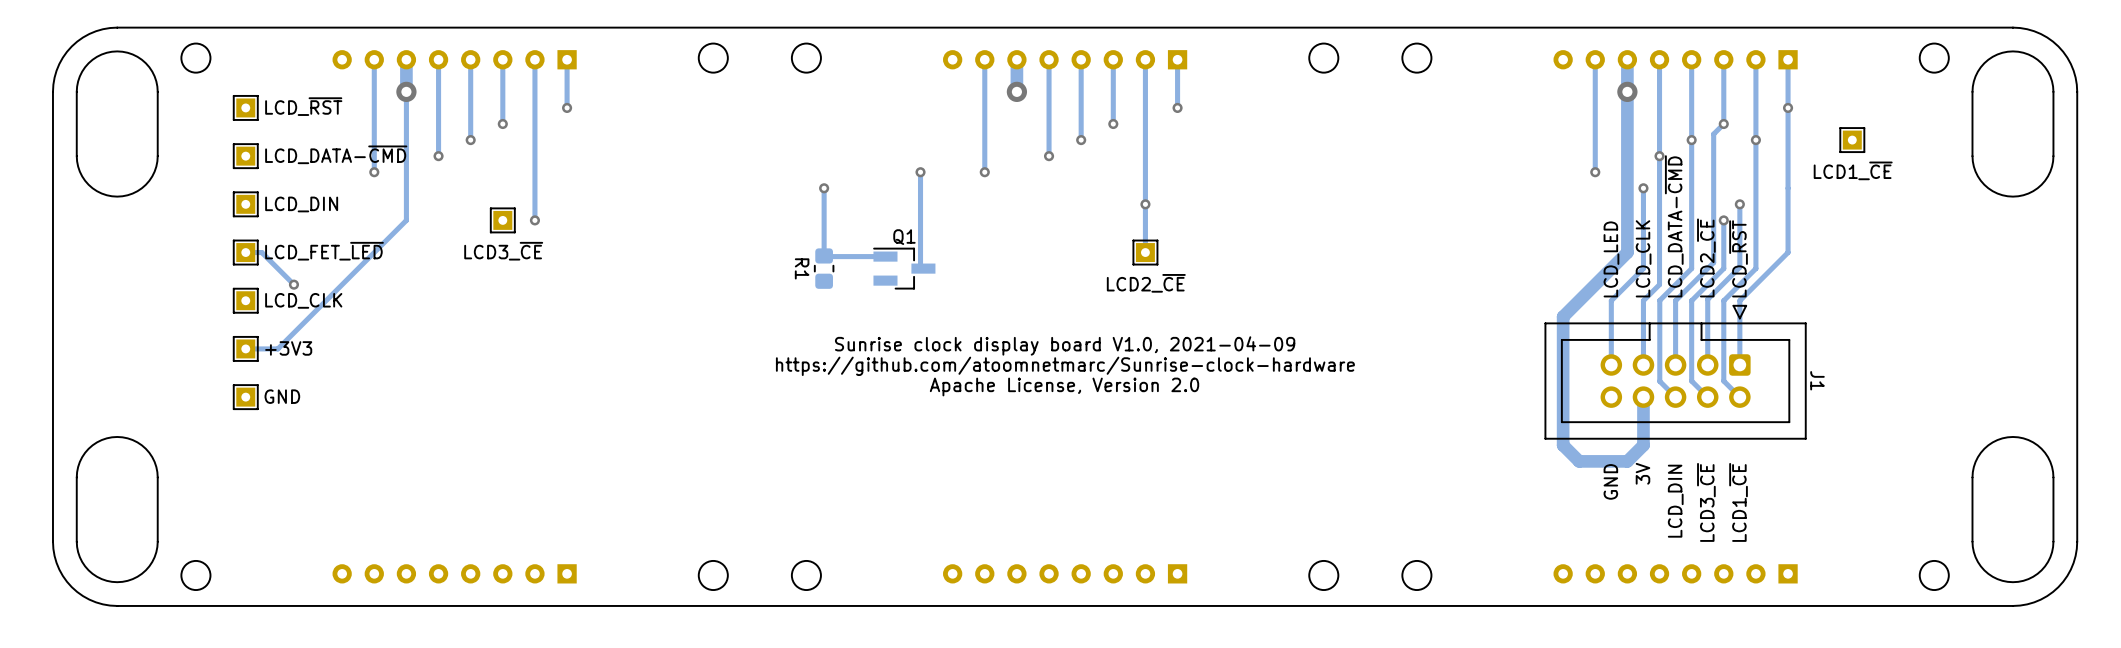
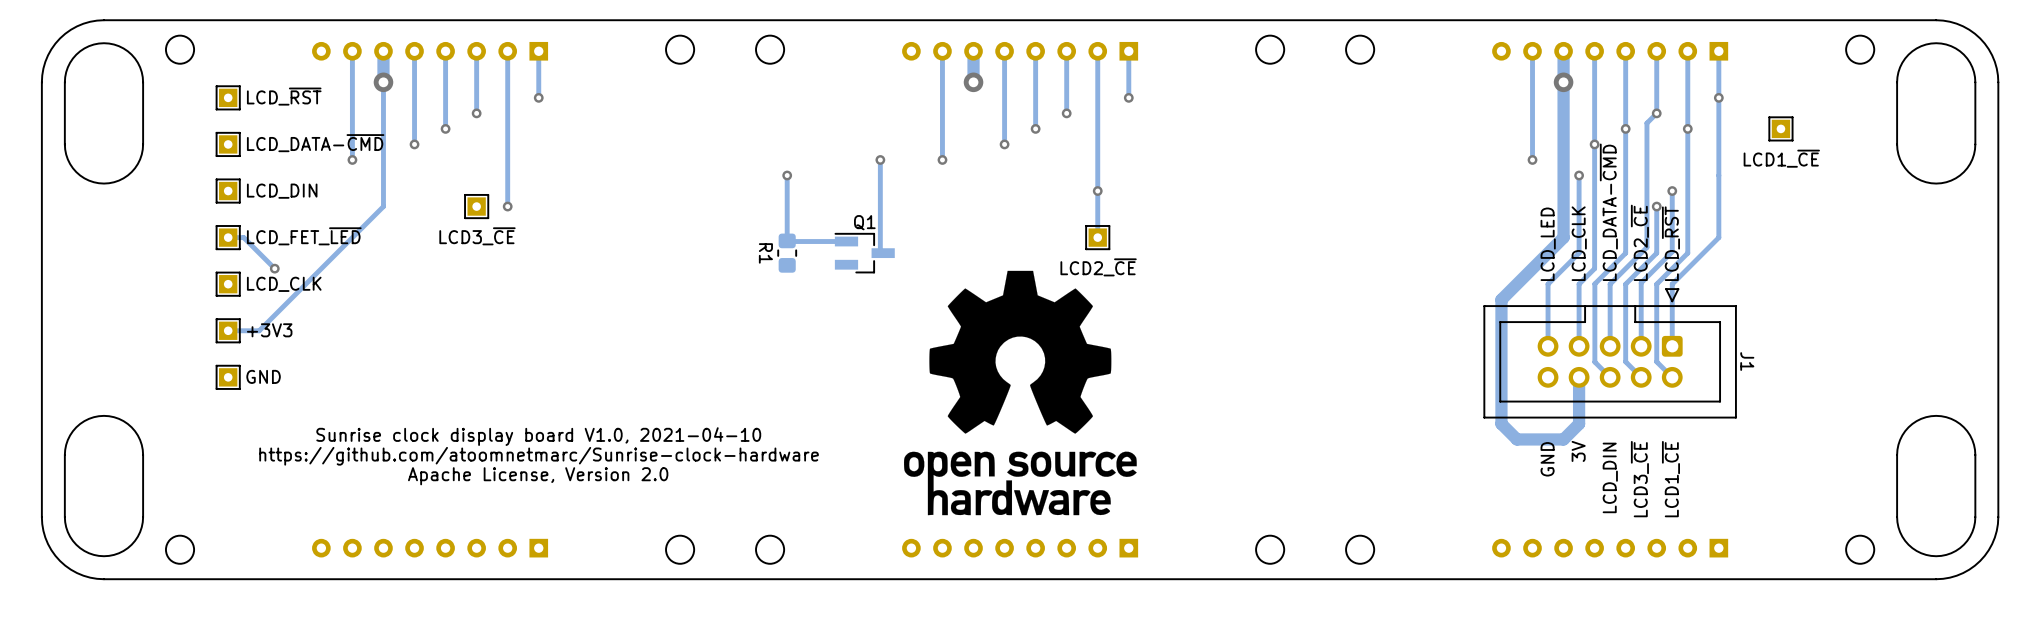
drawing: none -> [903, 270, 1137, 516]
text: Sunrise clock display board V1.0, 2021-04-09 (1065, 345) -> none
text: https://github.com/atoomnetmarc/Sunrise-clock-hardware (1065, 366) -> none
text: Apache License, Version 2.0 (1064, 386) -> none
text: none -> Sunrise clock display board V1.0, 2021-04-10 (538, 436)
text: none -> https://github.com/atoomnetmarc/Sunrise-clock-hardware (539, 456)
text: none -> Apache License, Version 2.0 (538, 476)

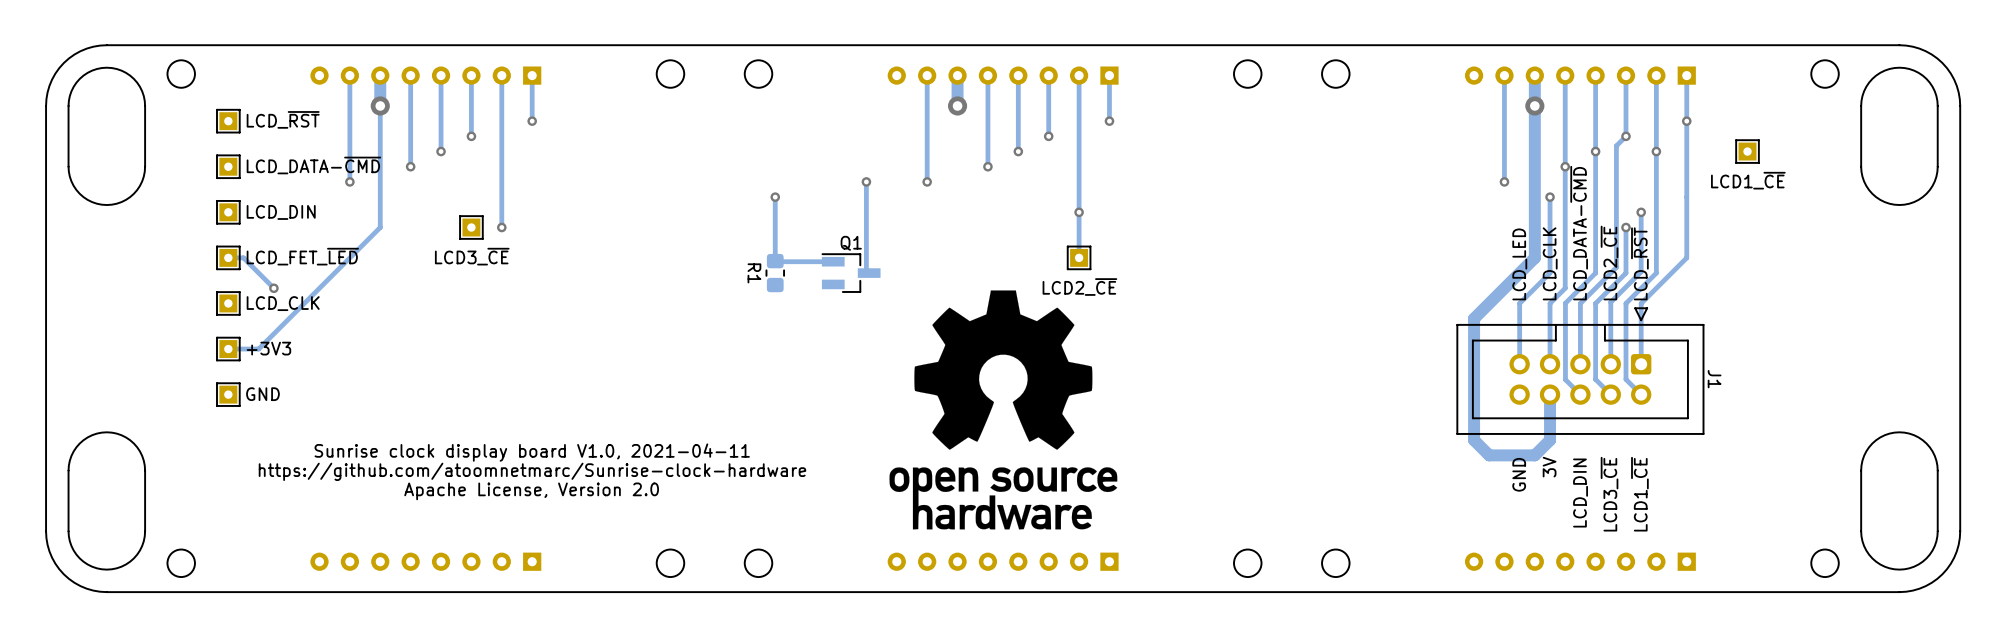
text: Sunrise clock display board V1.0, 2021-04-10 (538, 436) -> Sunrise clock display board V1.0, 2021-04-11 (532, 452)

